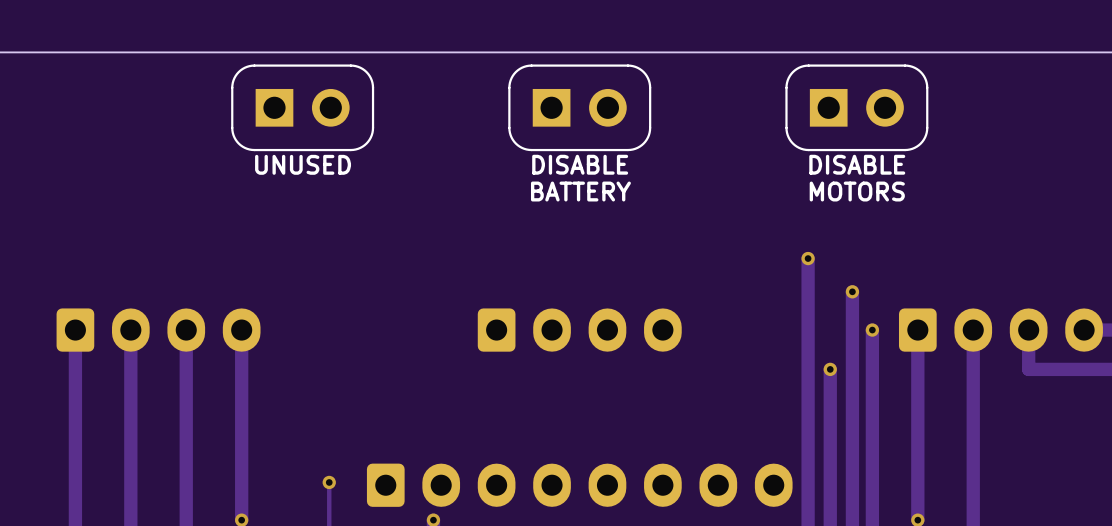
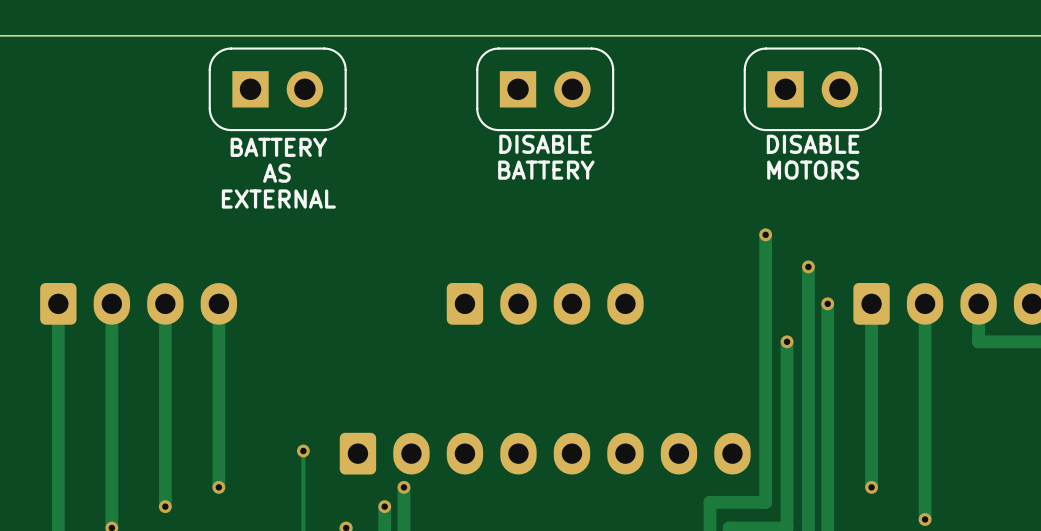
text: UNUSED (303, 164) -> BATTERY (278, 147)
text: none -> AS (276, 173)
text: none -> EXTERNAL (278, 199)

